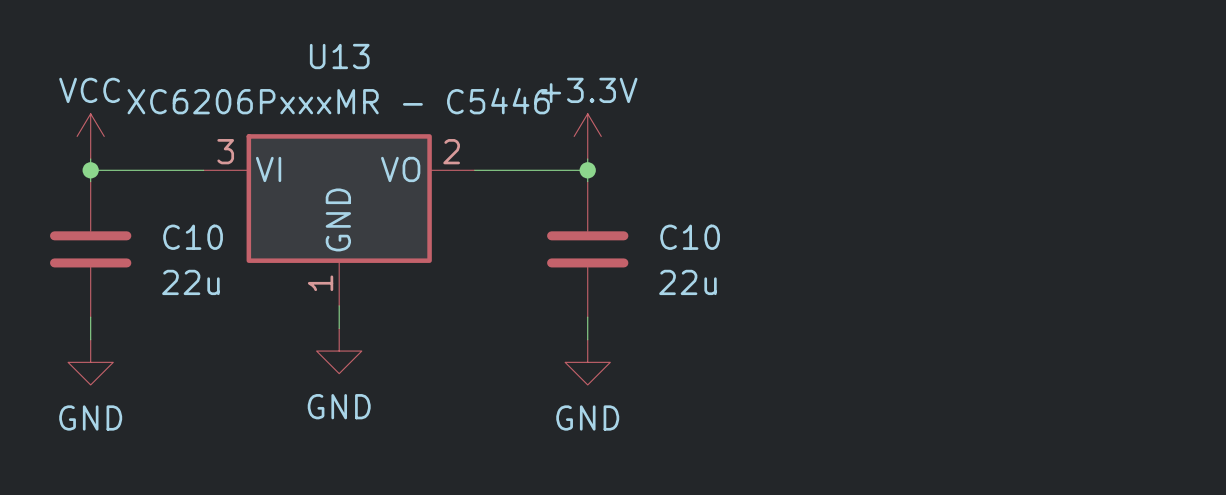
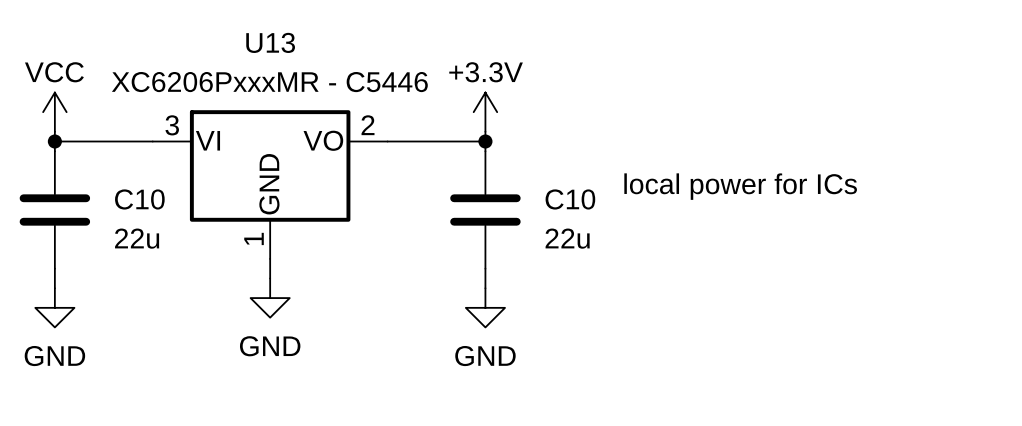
text: none -> local power for ICs (740, 186)

